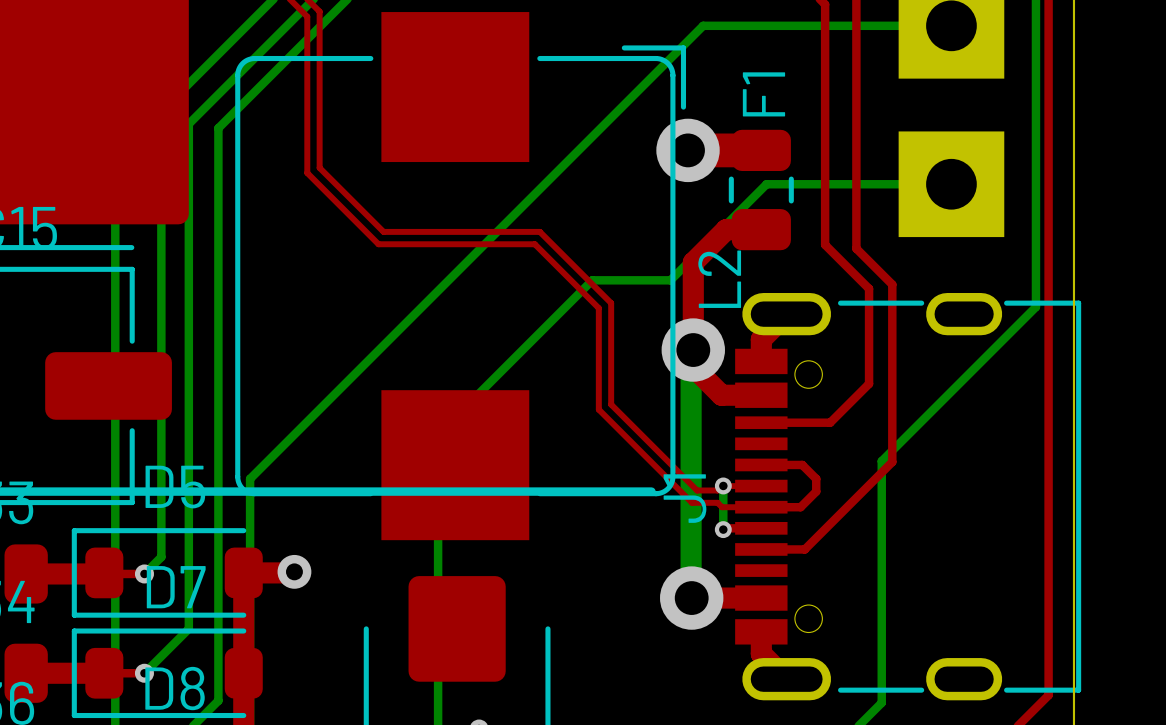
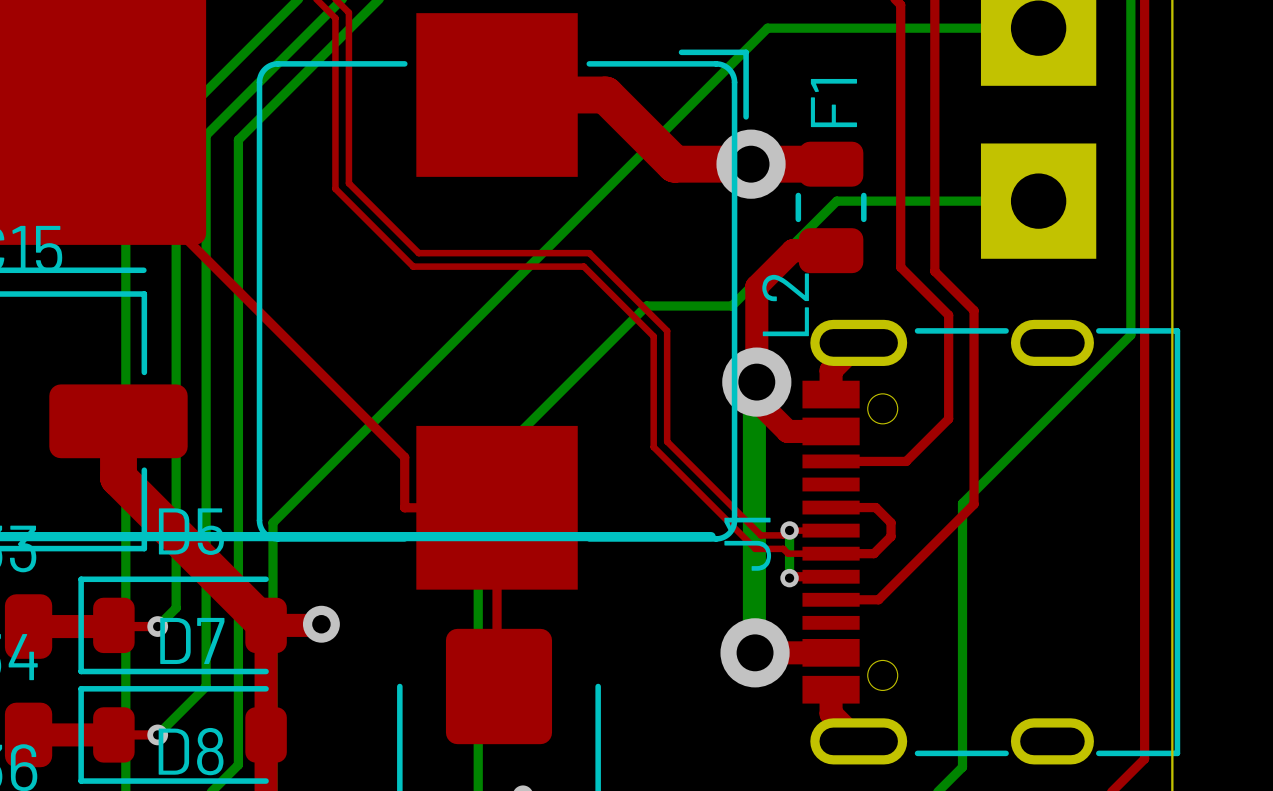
top track: none -> (497, 95) (605, 95) (674, 164) (751, 164)
top track: none -> (58, 111) (404, 457) (404, 507) (497, 507) (497, 684) (498, 686)
top track: none -> (118, 421) (118, 477) (266, 625)

